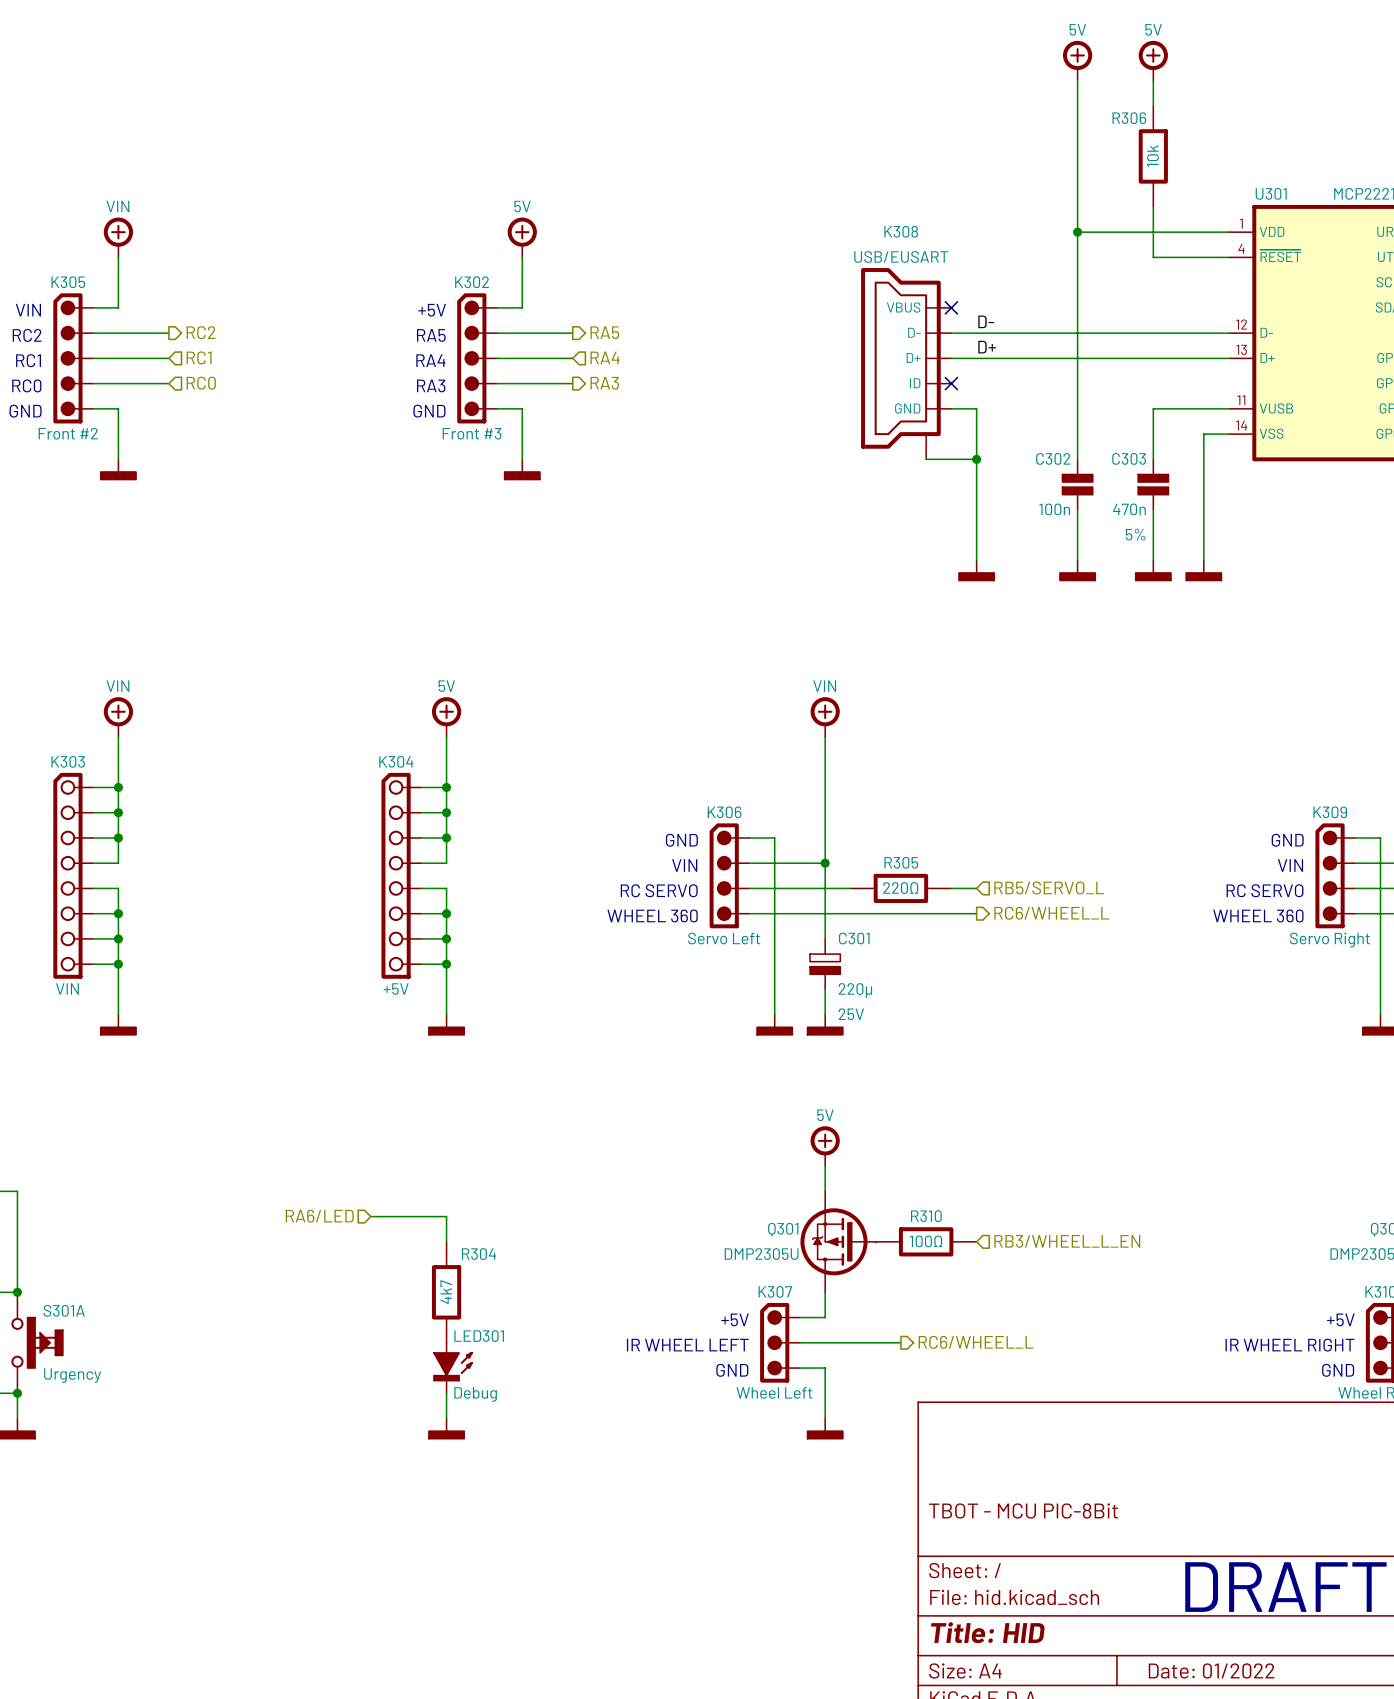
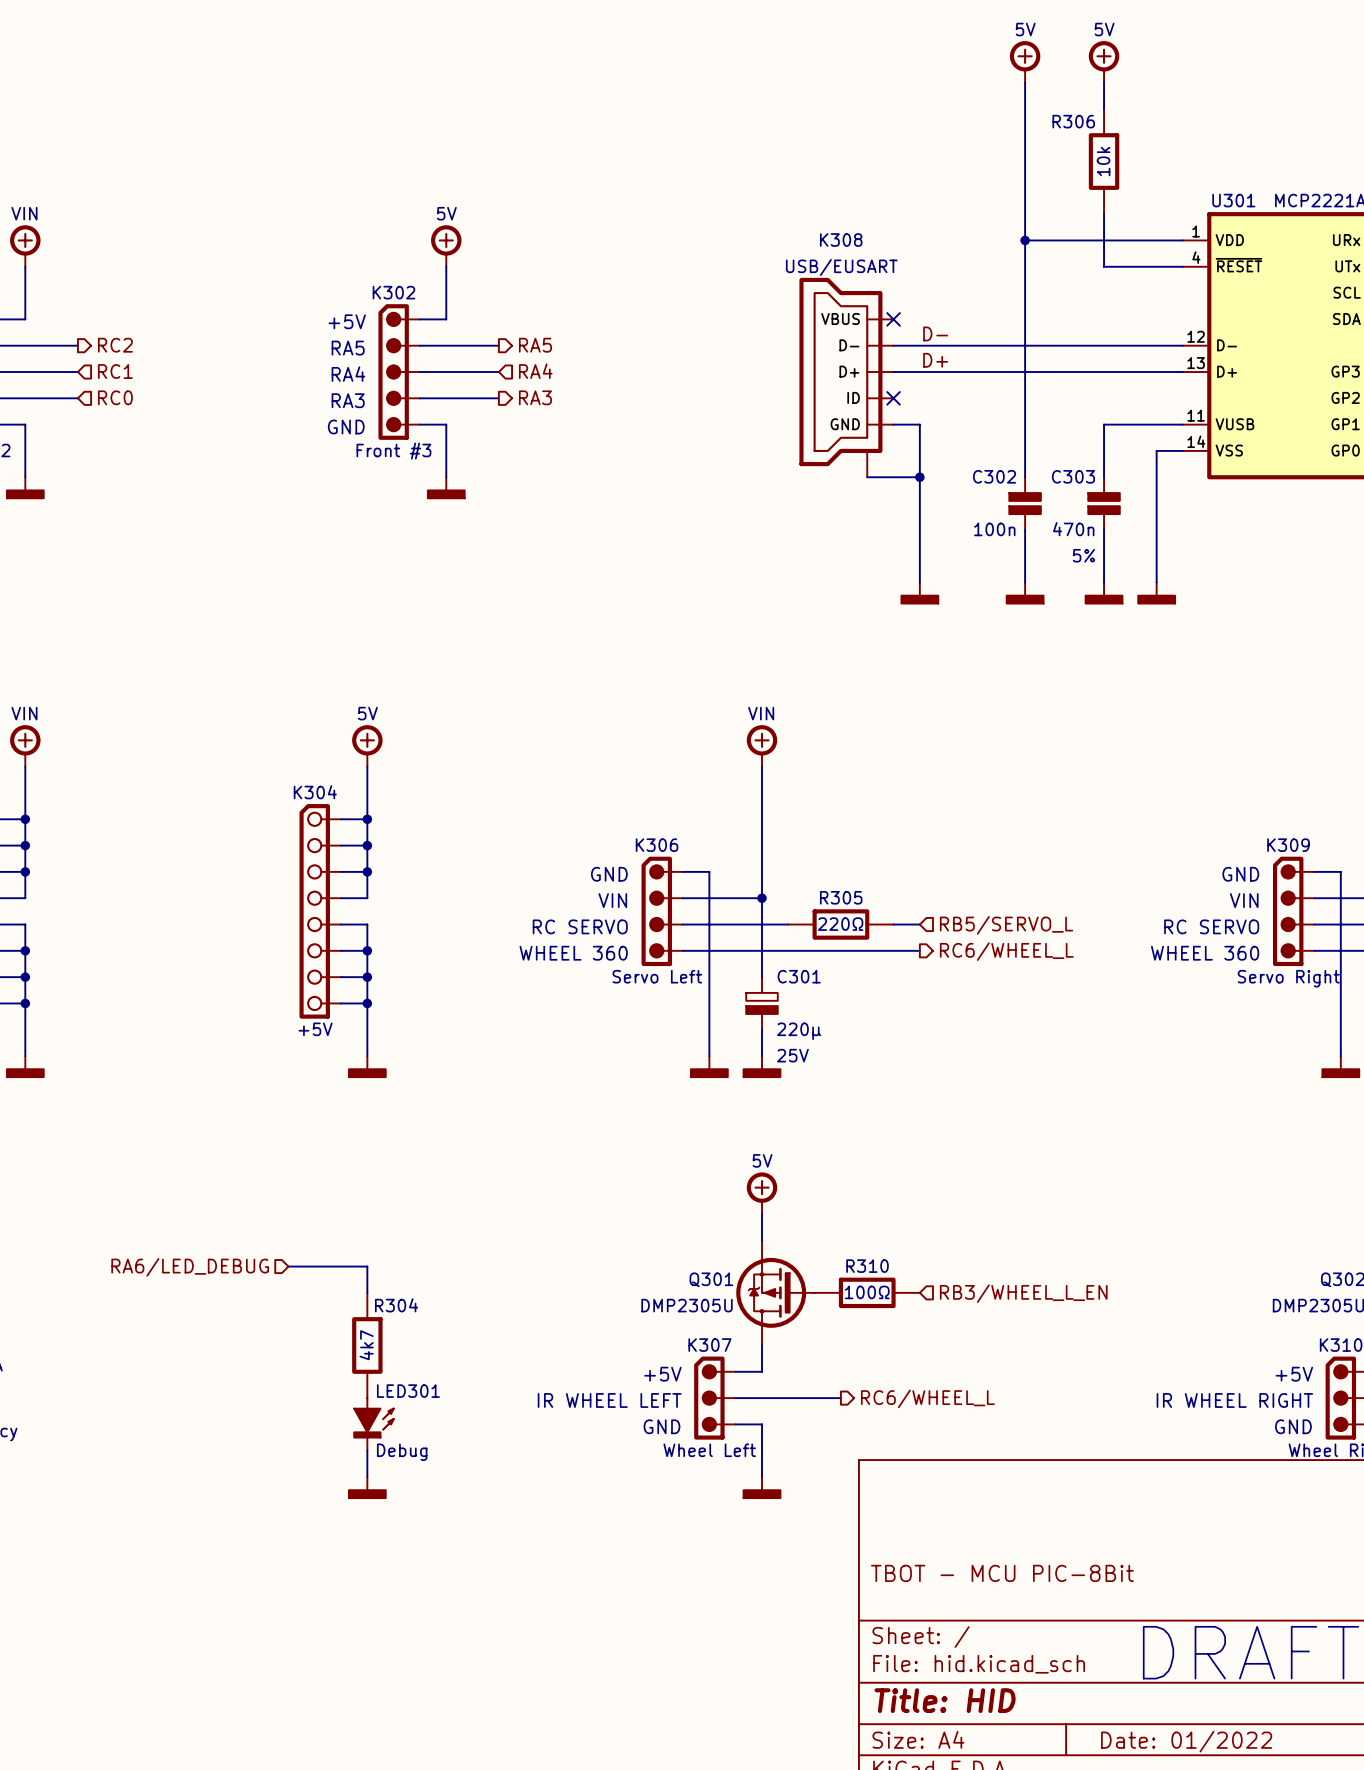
hierarchical label: RA6/LED (319, 1216) -> RA6/LED_DEBUG (190, 1267)

